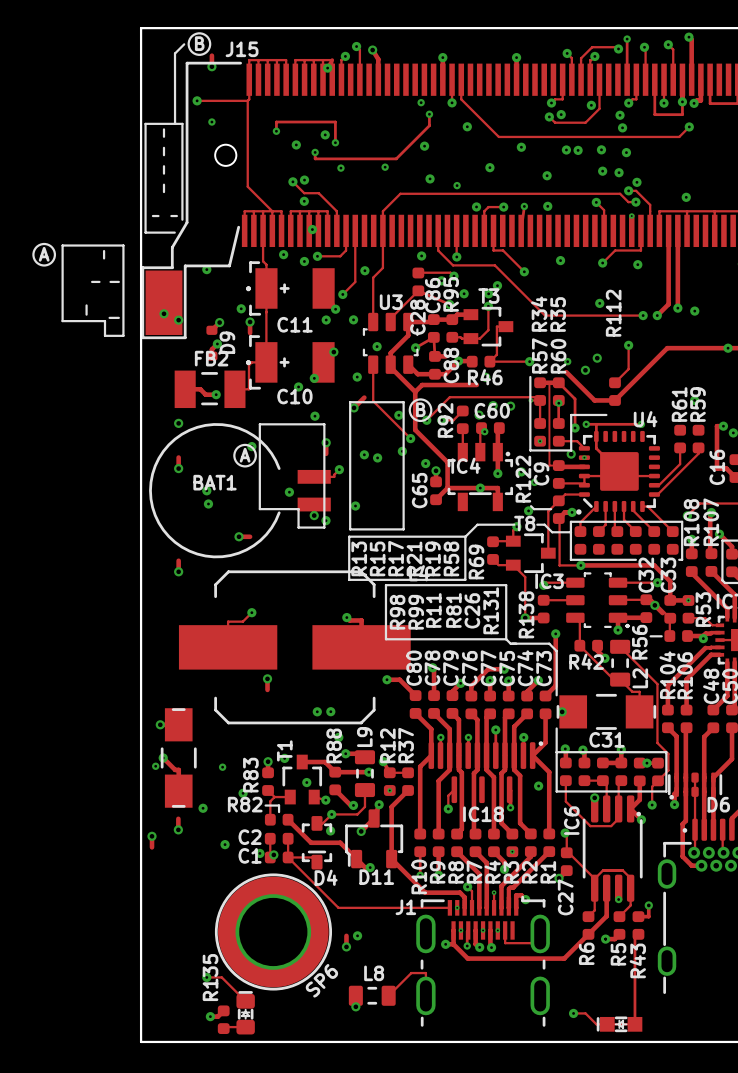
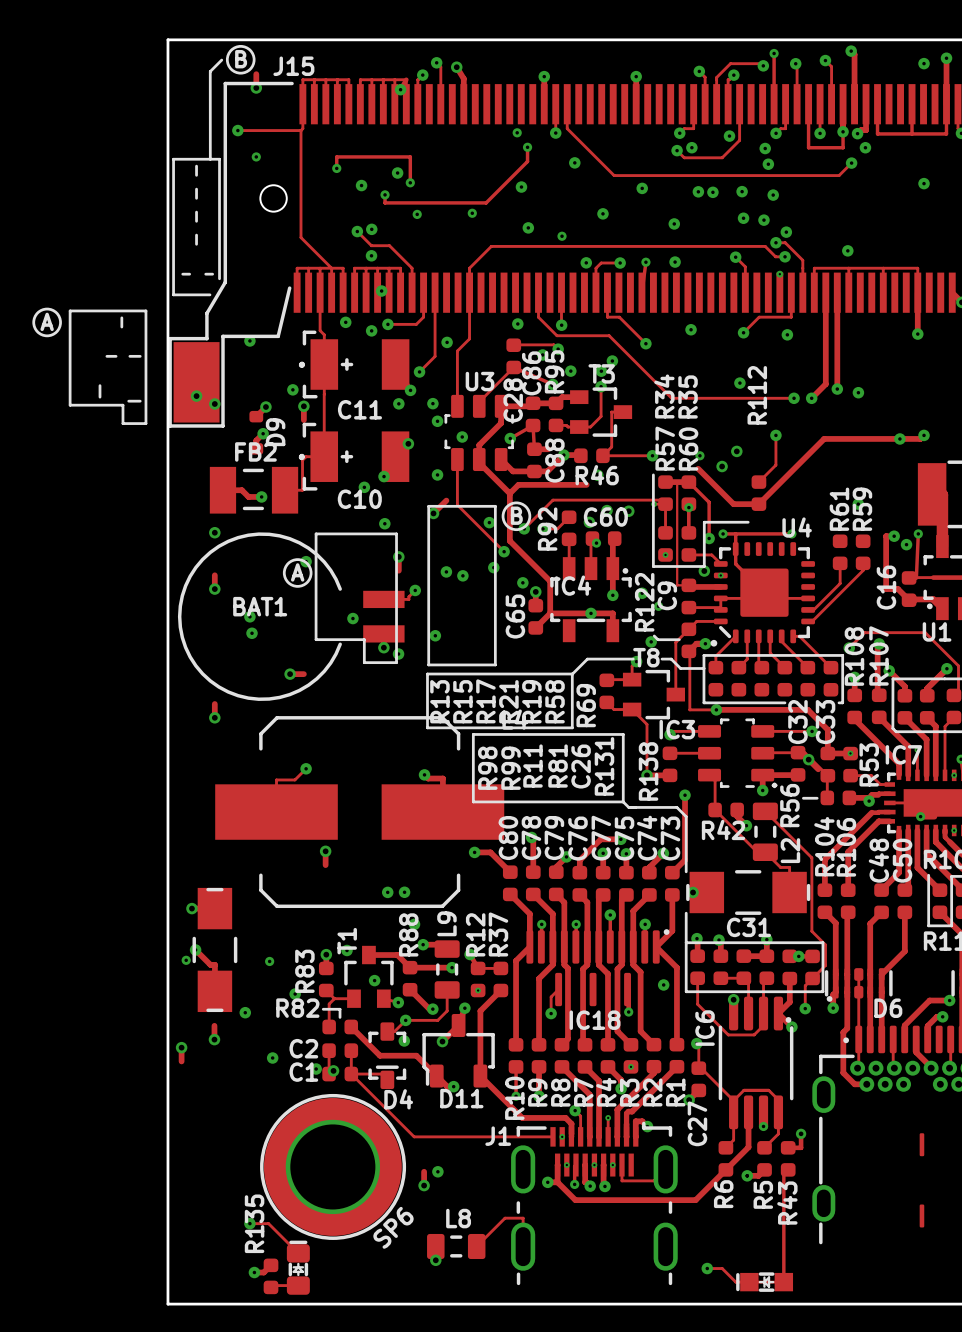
via: none -> (865, 147)
via: none -> (437, 421)

